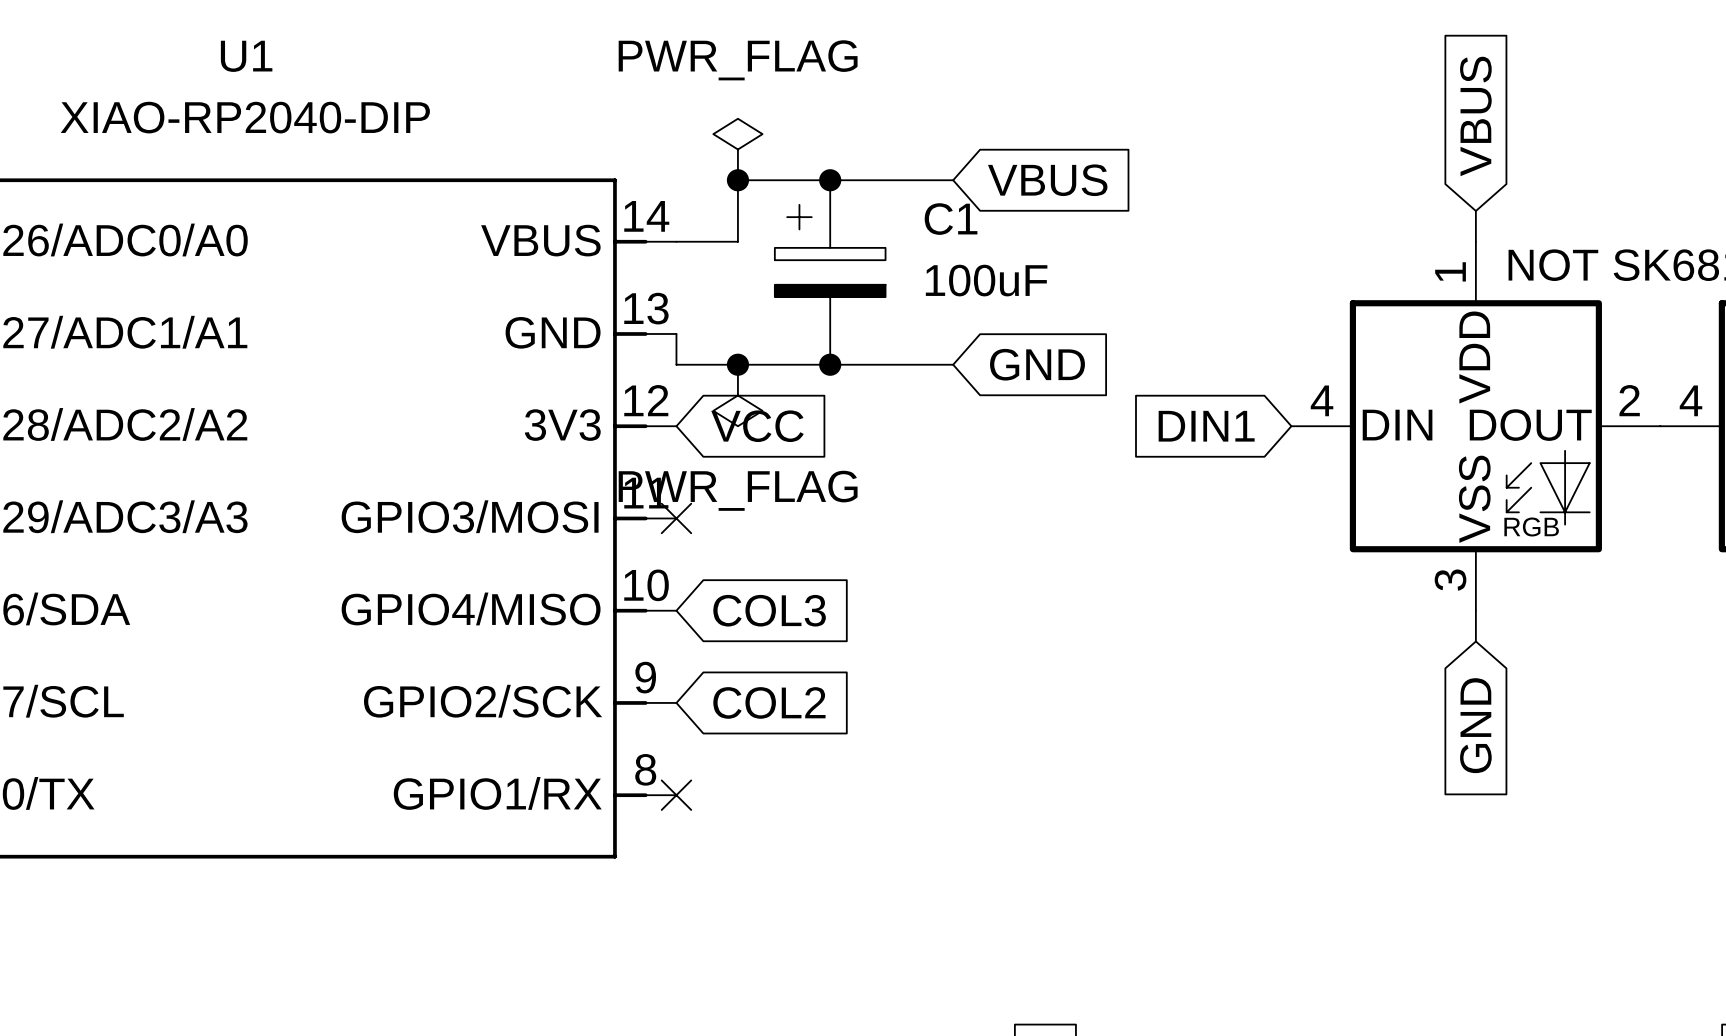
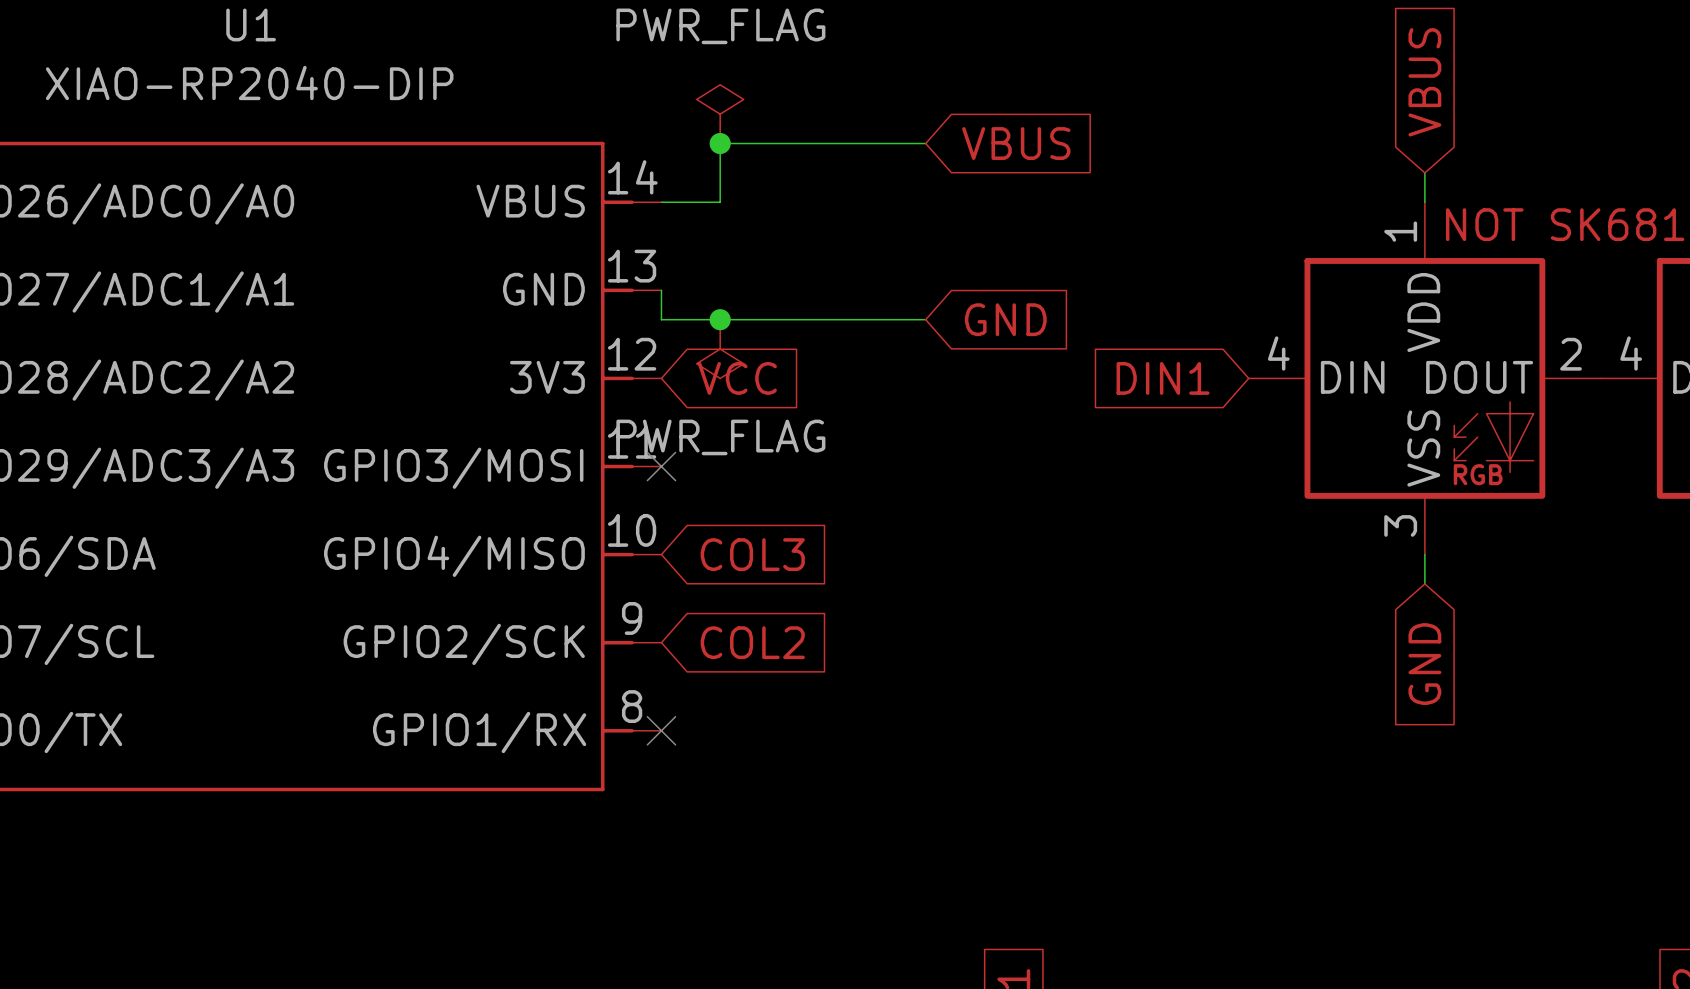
junction: (830, 180) -> none
C1: 100uF (830, 272) -> none
junction: (830, 364) -> none

